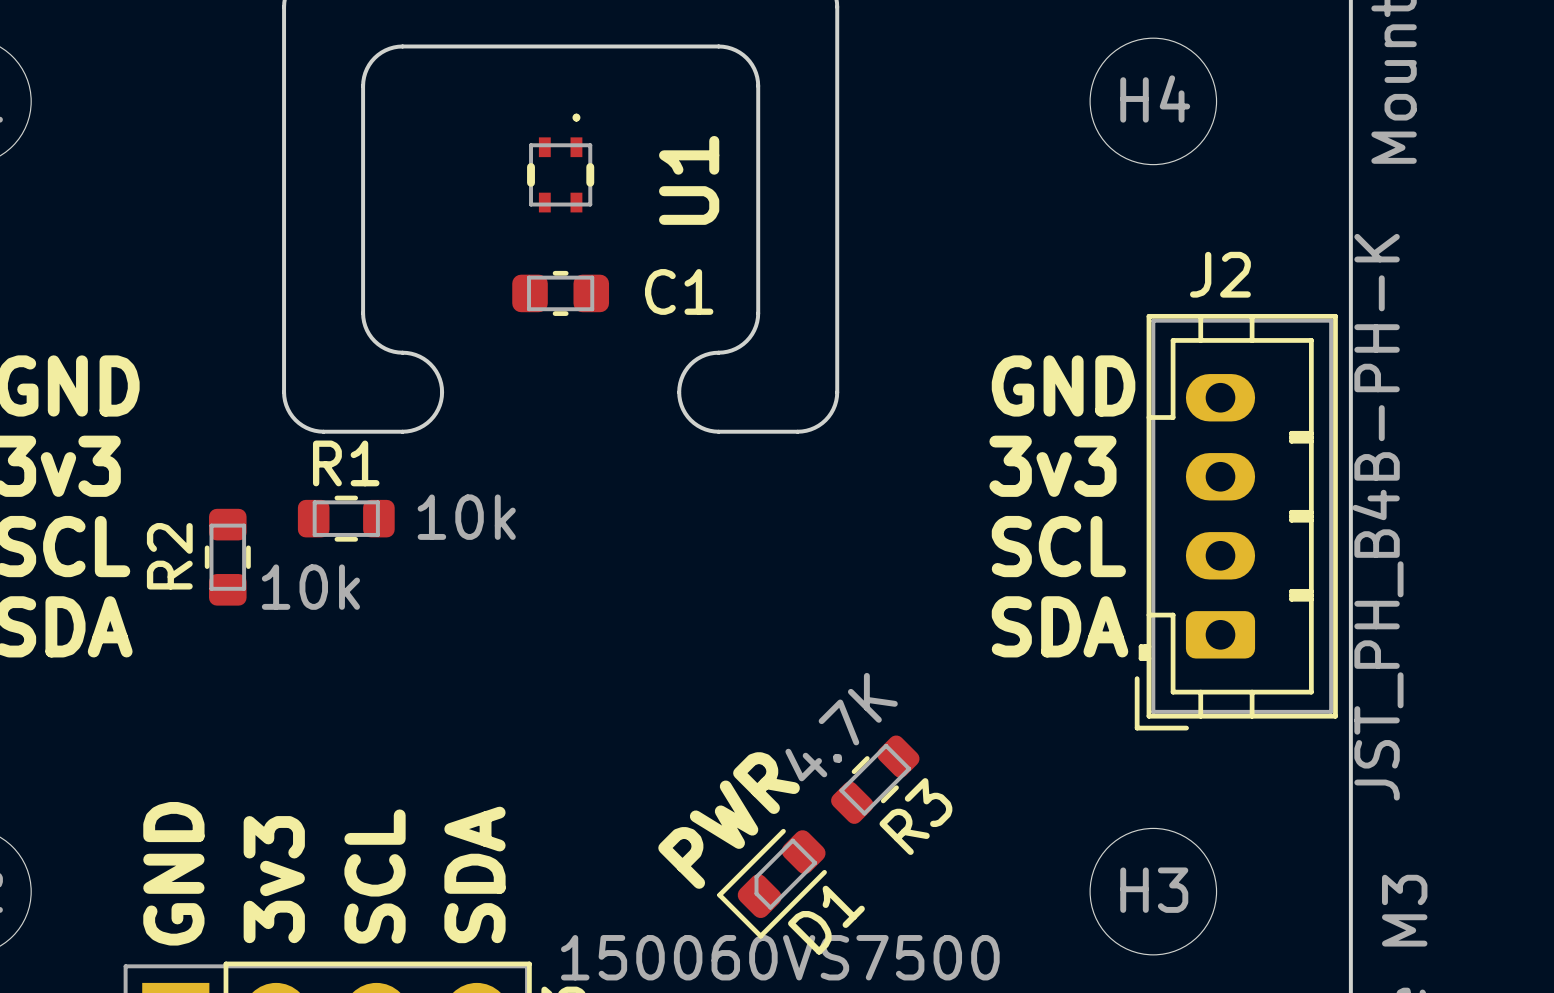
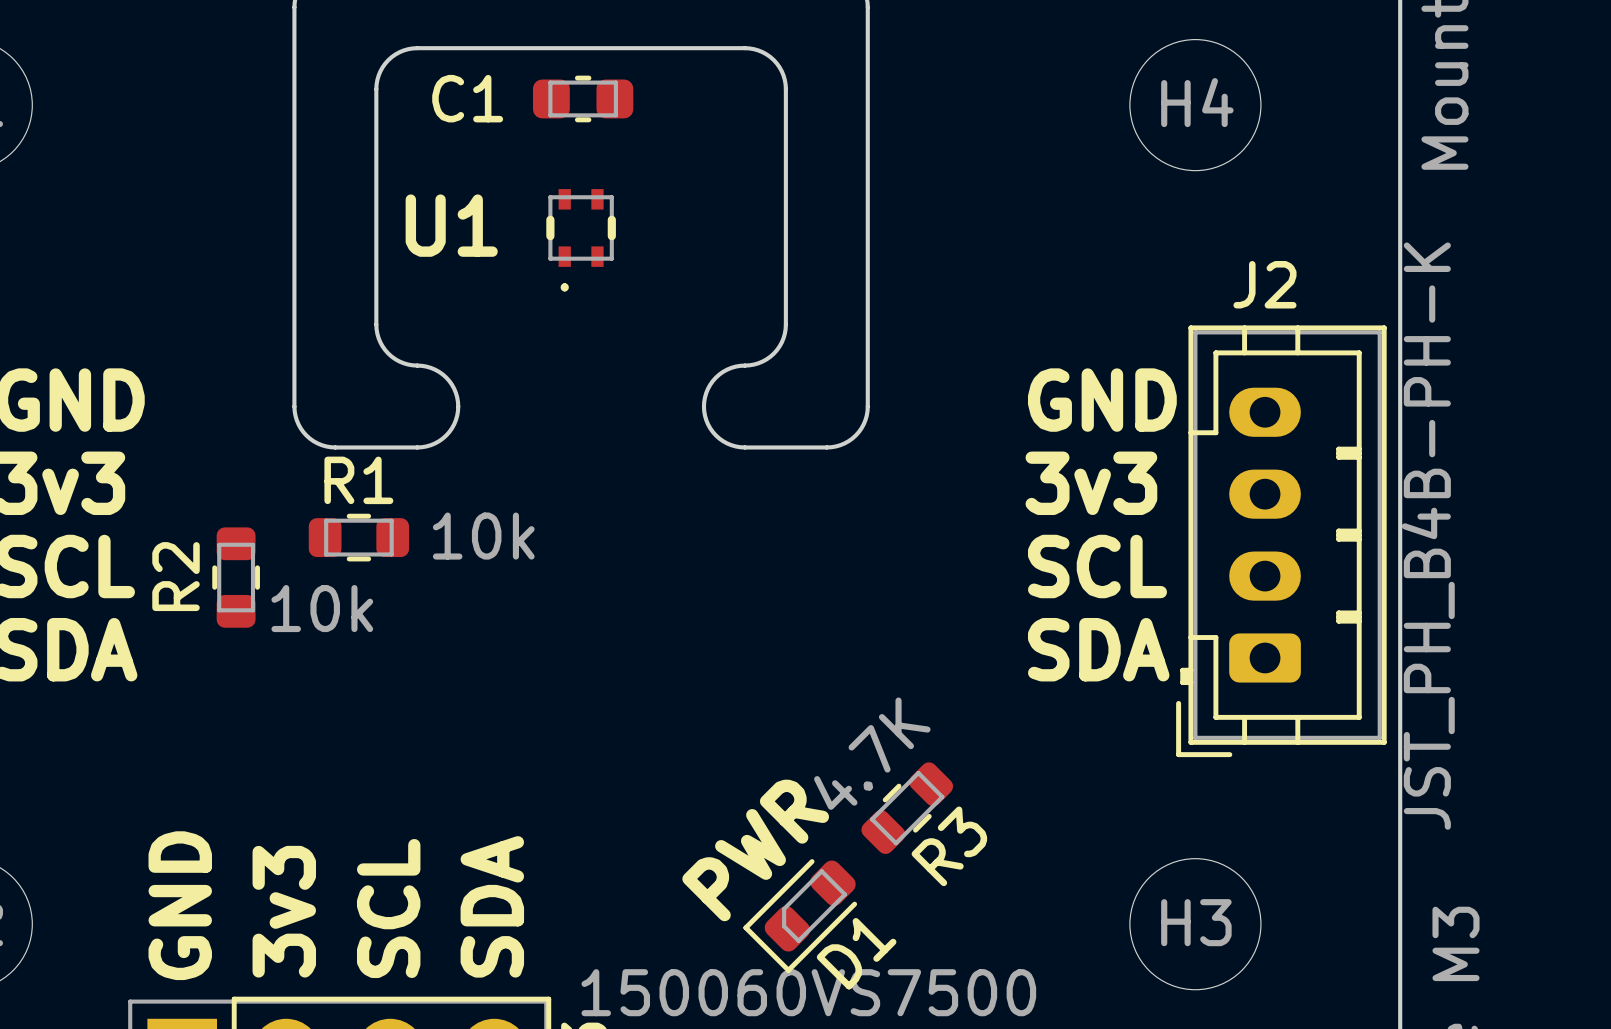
U1 rotation: 0° (560, 163) -> 180° (581, 240)
U1 position: (560, 163) -> (581, 240)
C1 name position: C1 (679, 291) -> C1 (467, 98)
C1 position: (560, 293) -> (583, 98)

